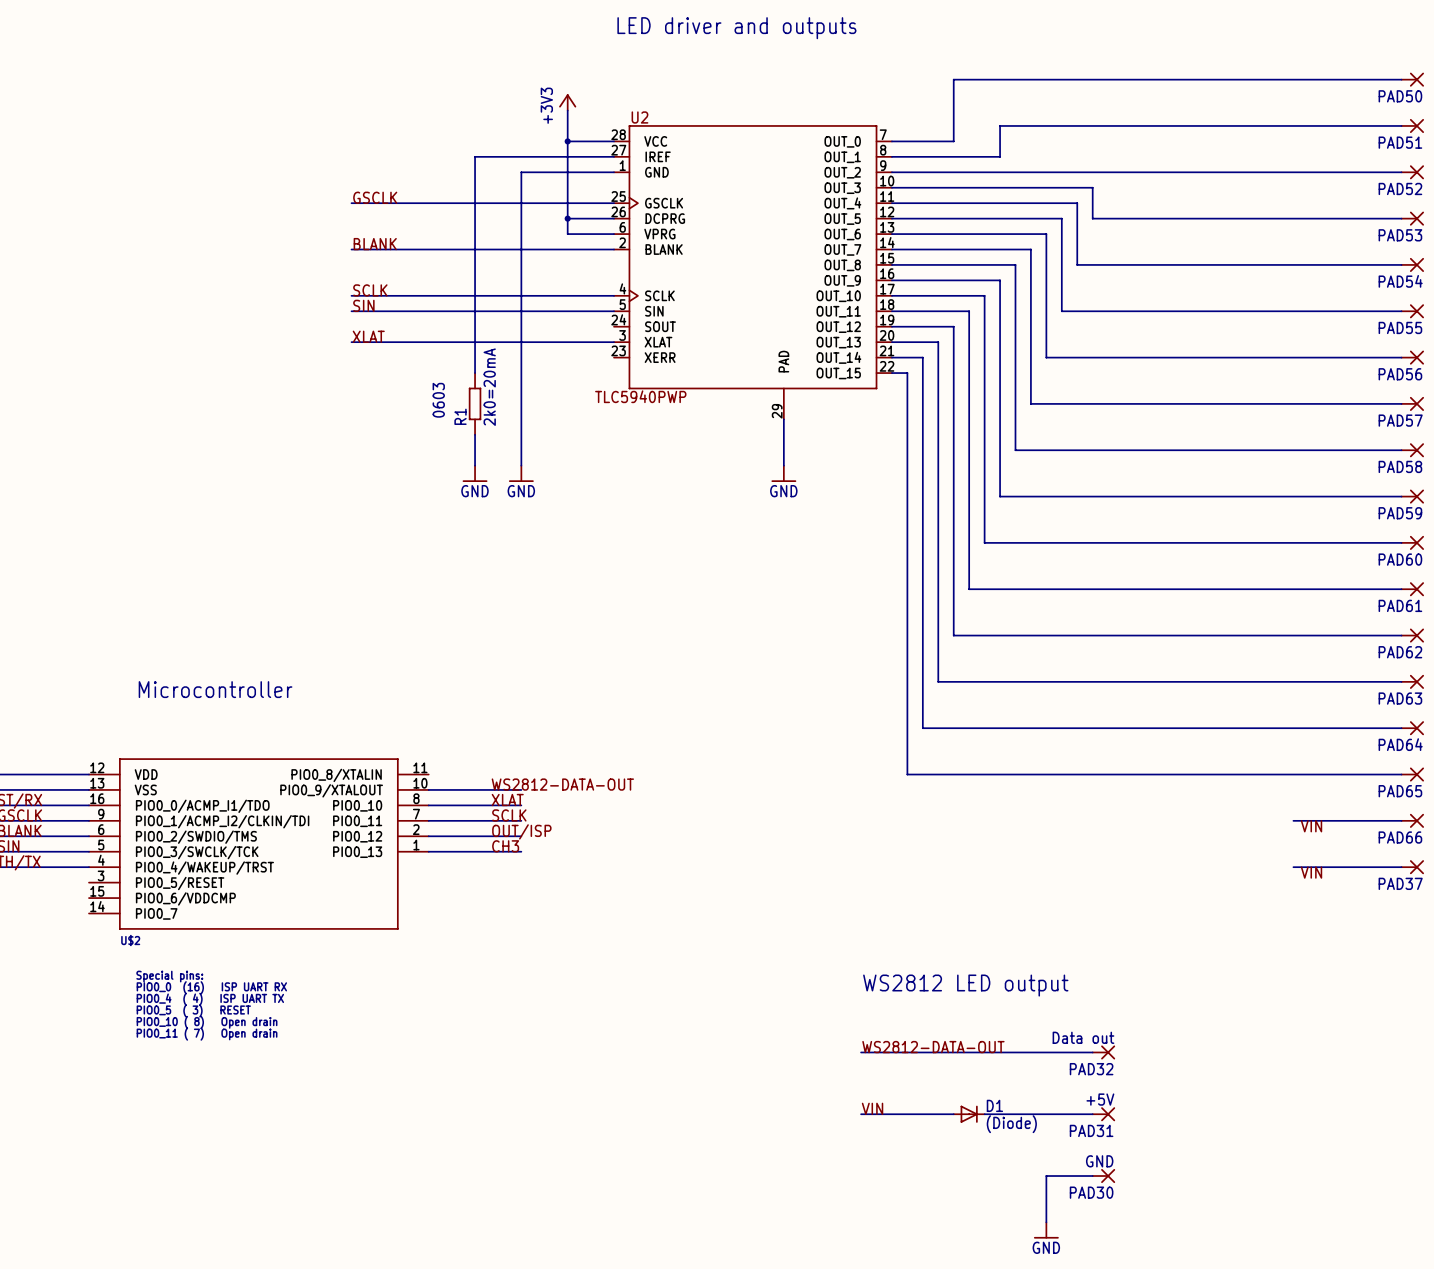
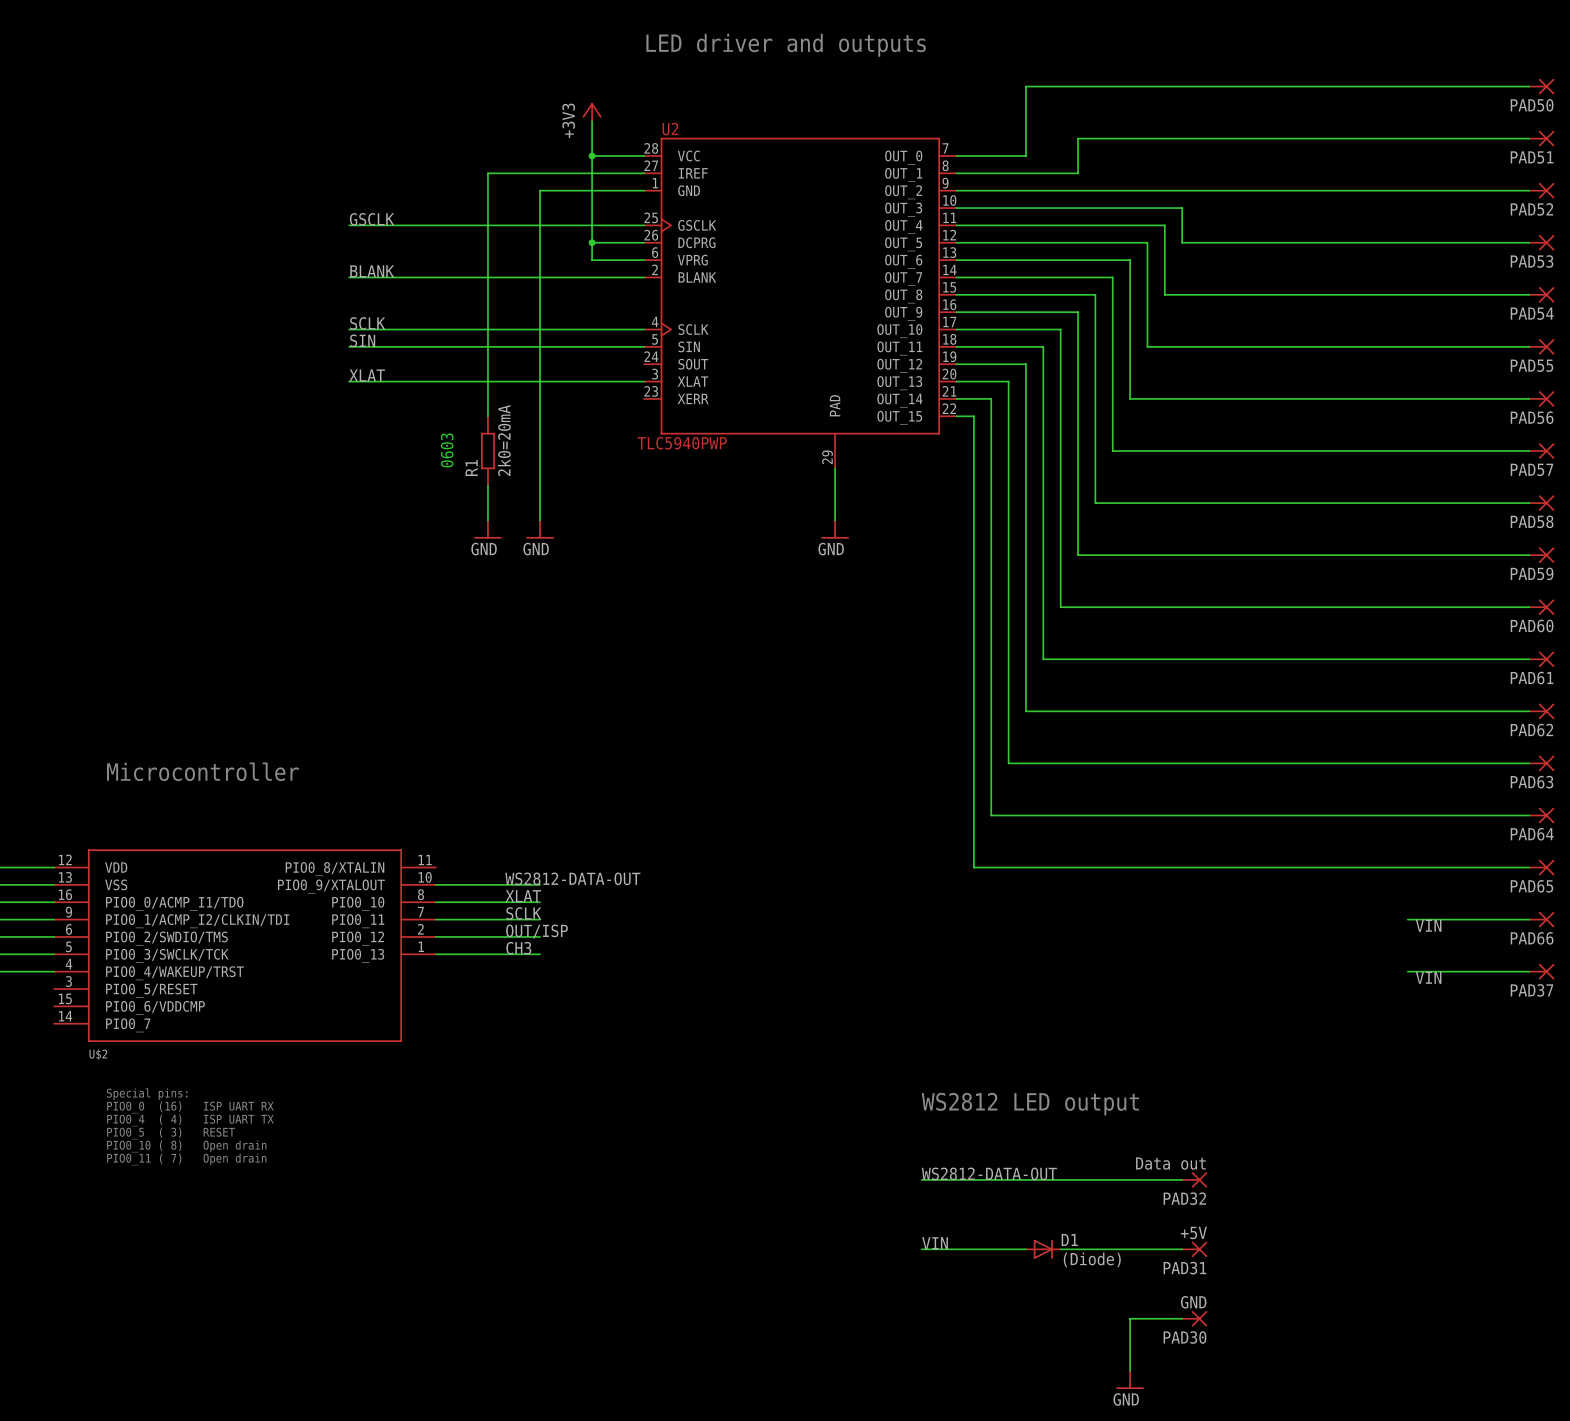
text position: LED driver and outputs (736, 28) -> LED driver and outputs (786, 45)

